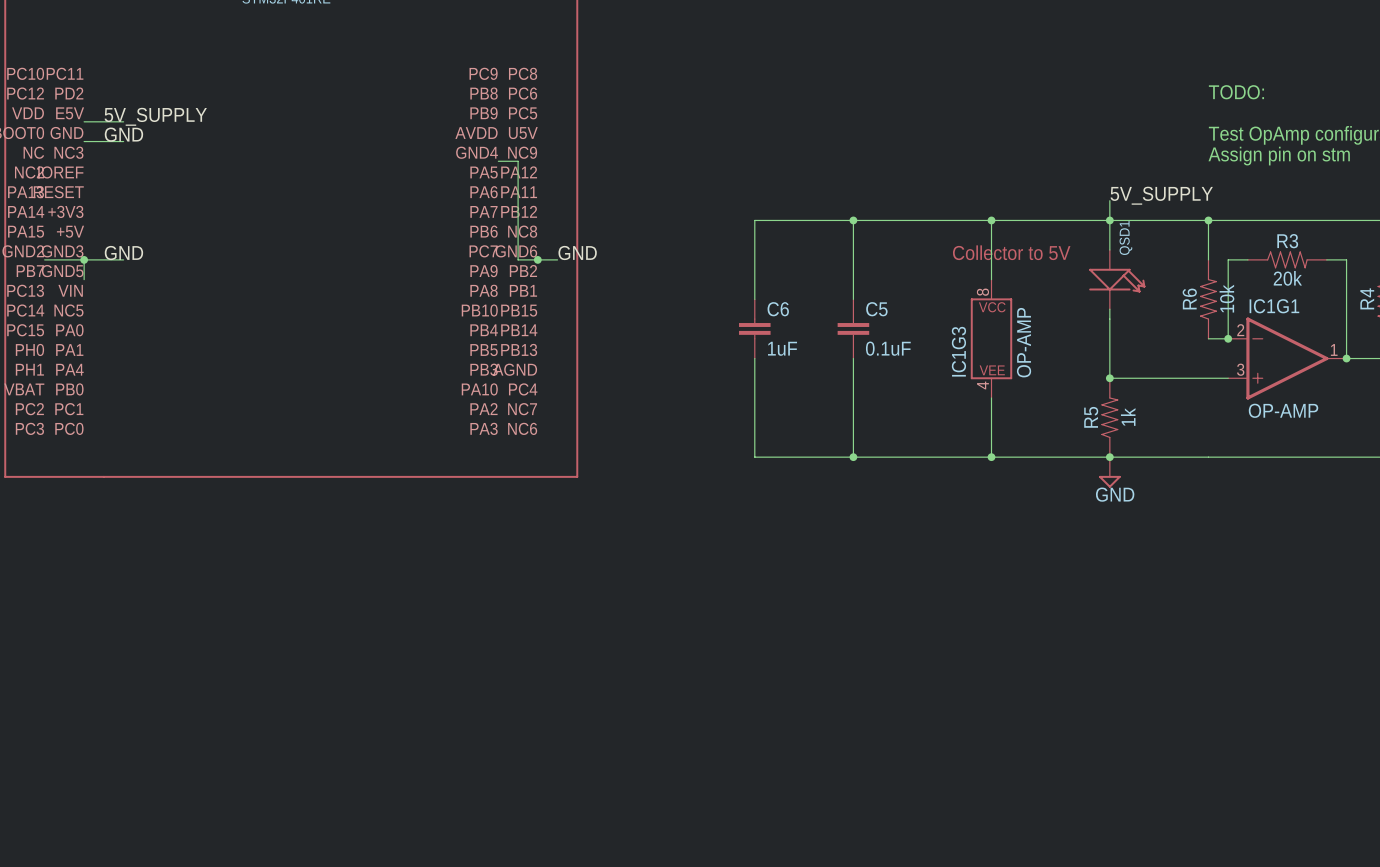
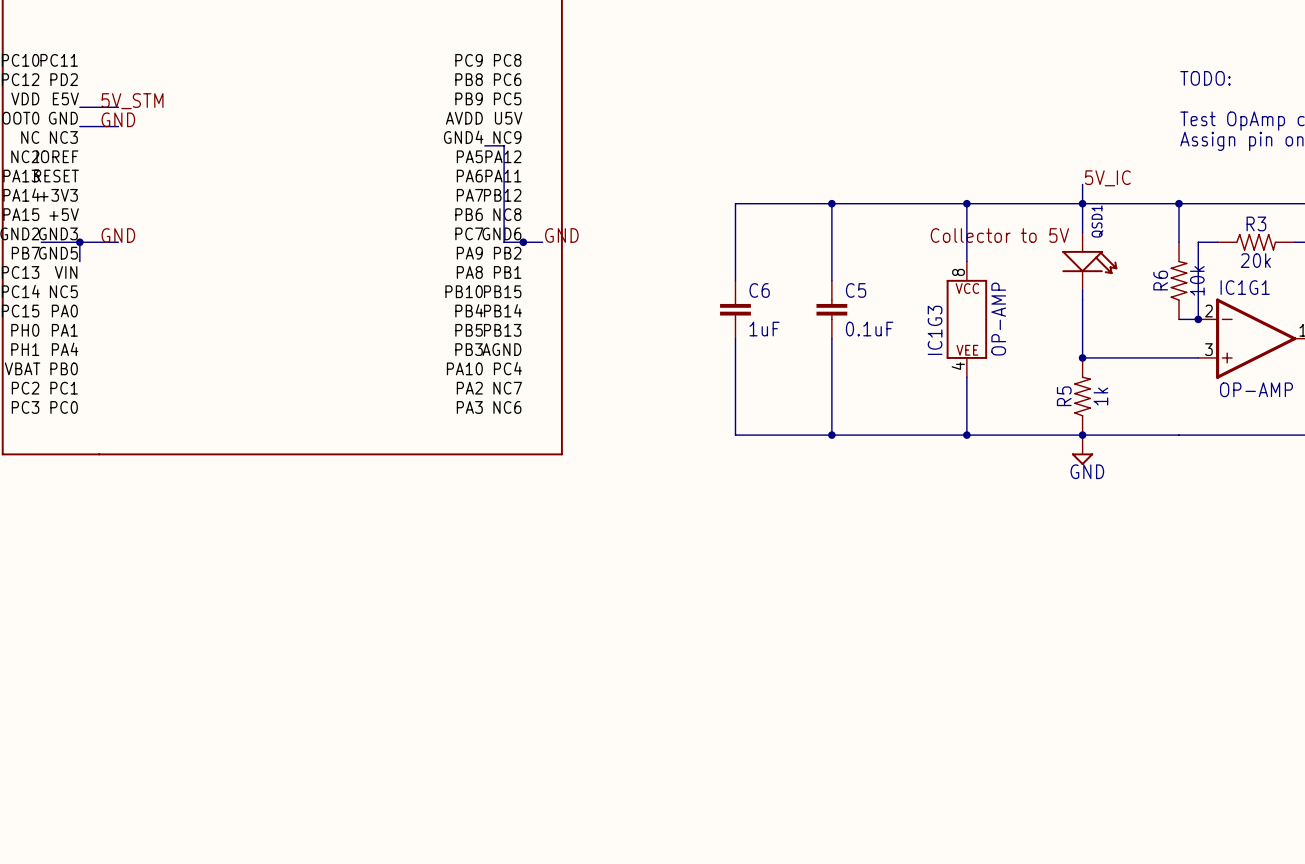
label: 5V_SUPPLY (155, 116) -> 5V_STM (132, 101)
label: 5V_SUPPLY (1161, 195) -> 5V_IC (1107, 178)

